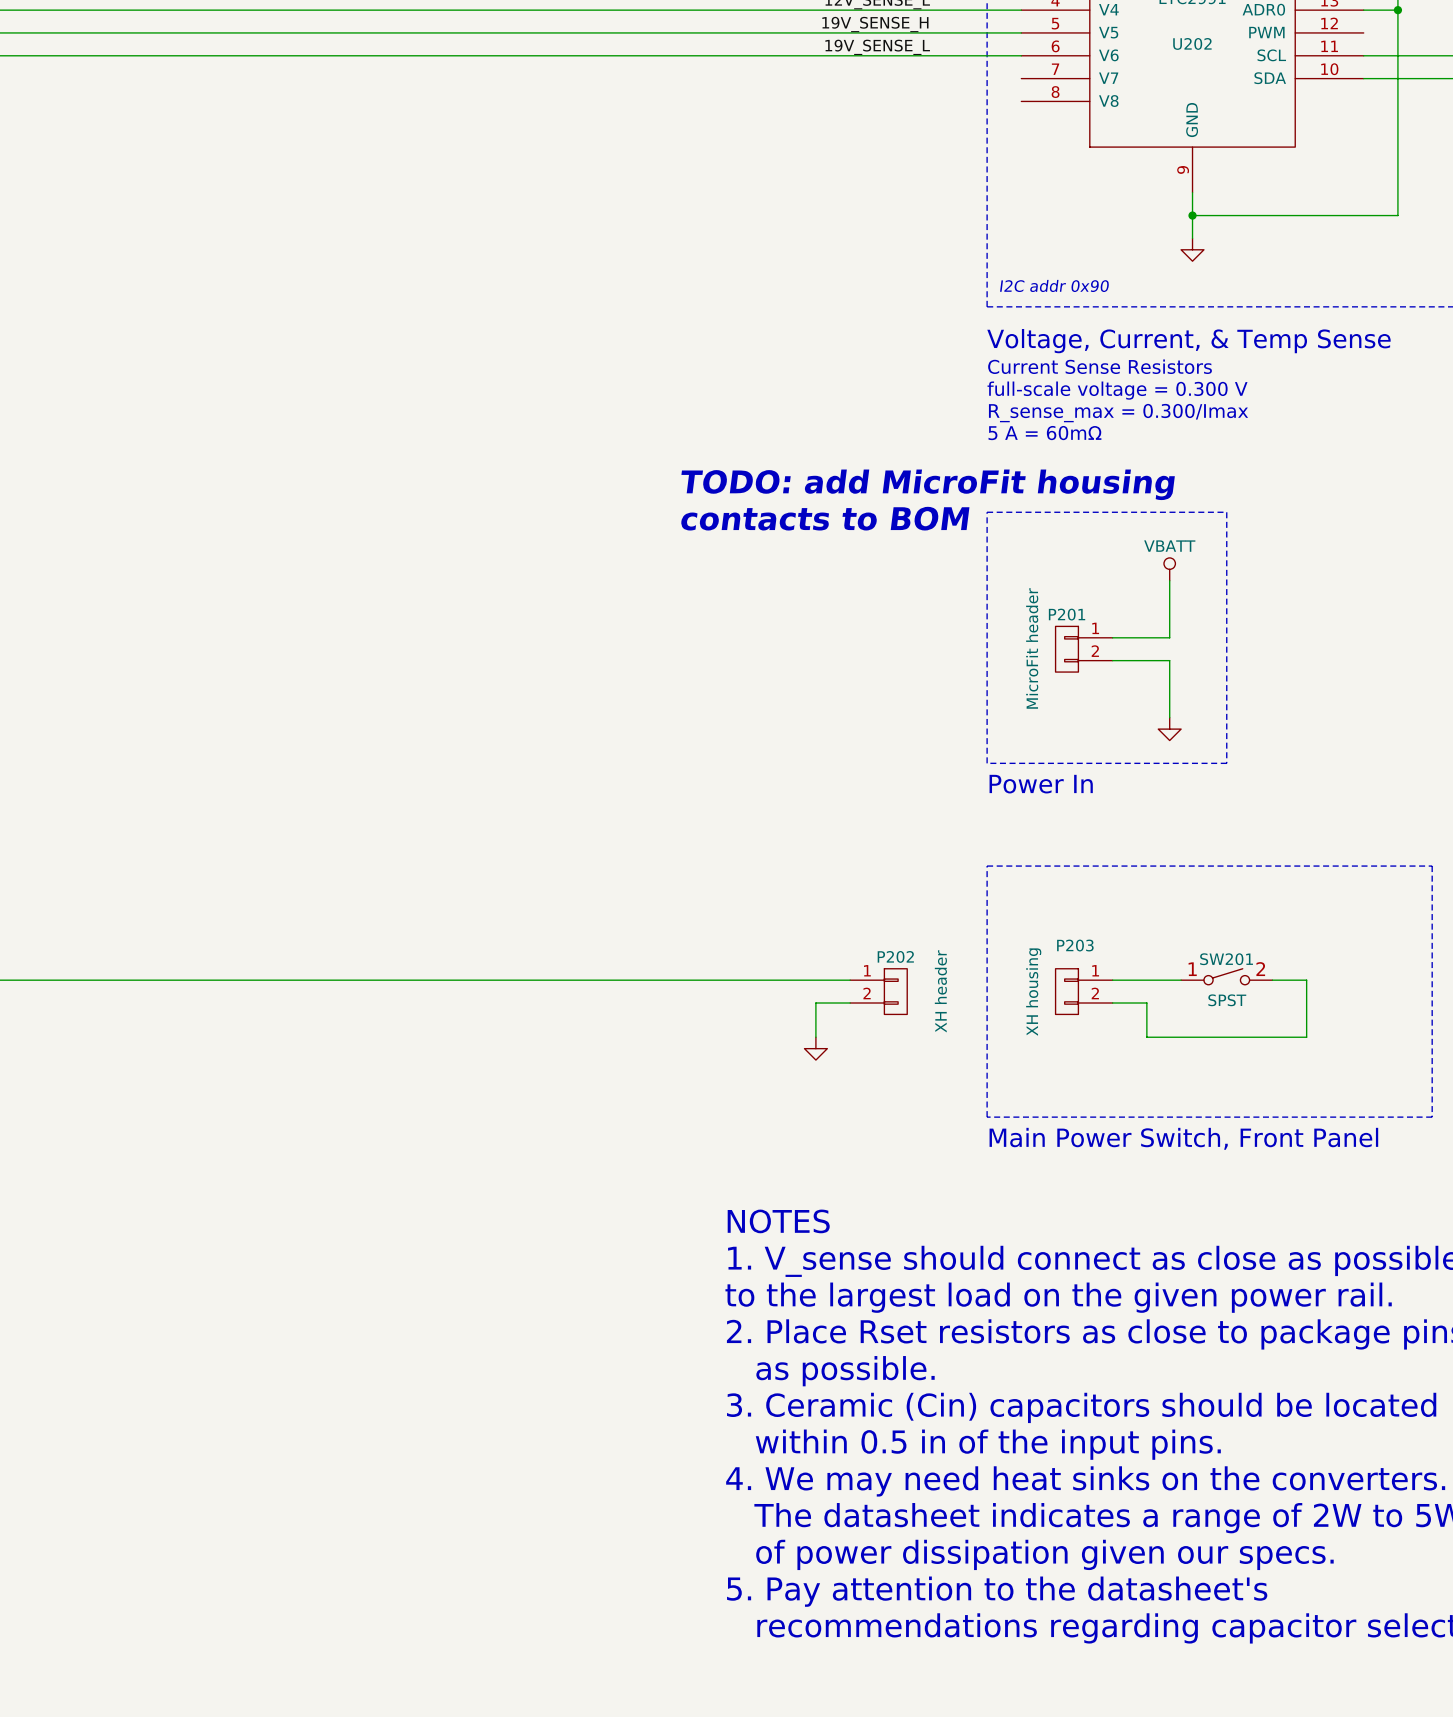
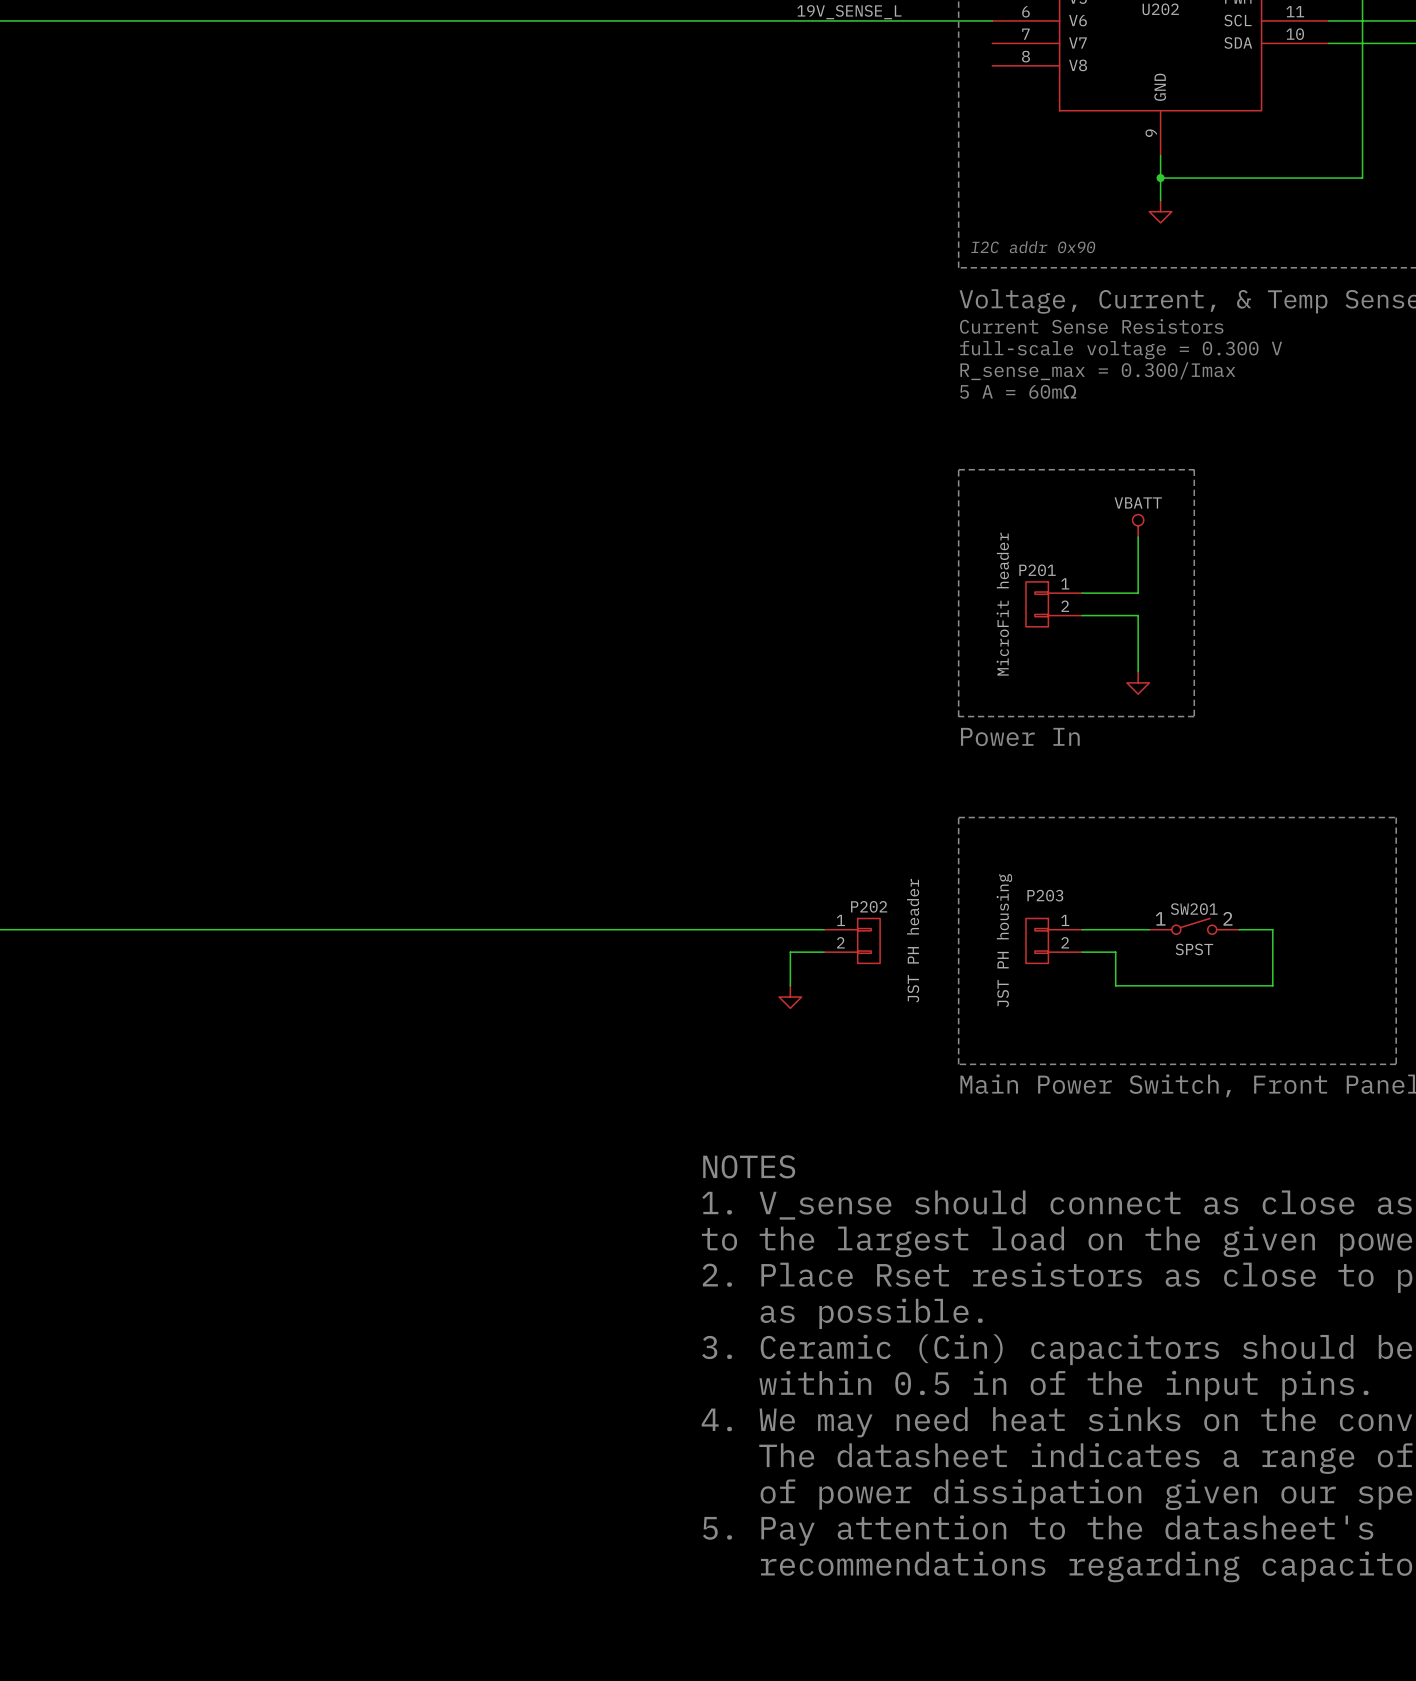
text: TODO: add MicroFit housing (928, 484) -> none
text: contacts to BOM (825, 518) -> none
P202 value: XH header (940, 991) -> JST PH header (913, 940)
P203 value: XH housing (1033, 992) -> JST PH housing (1004, 940)

